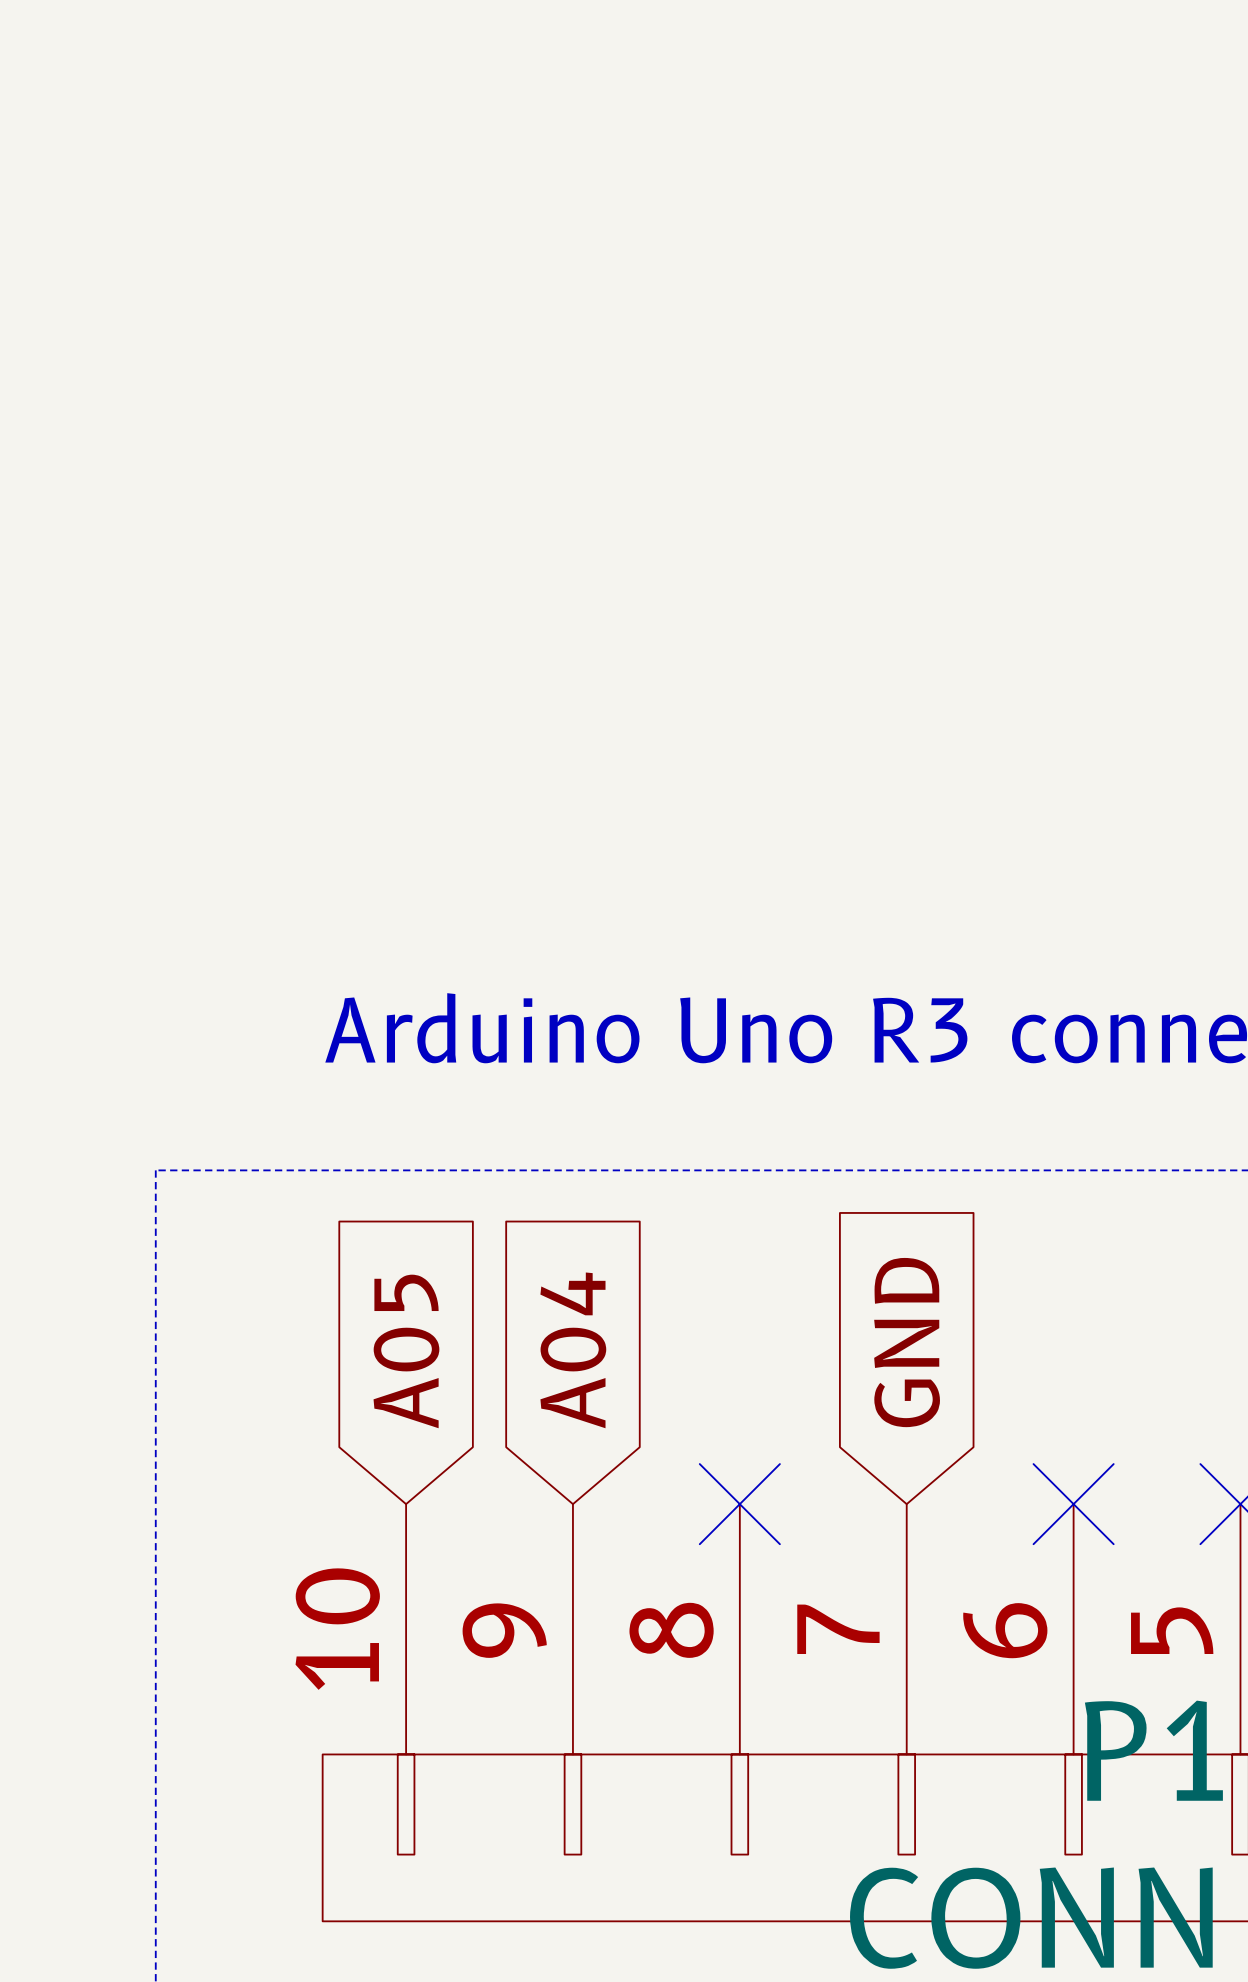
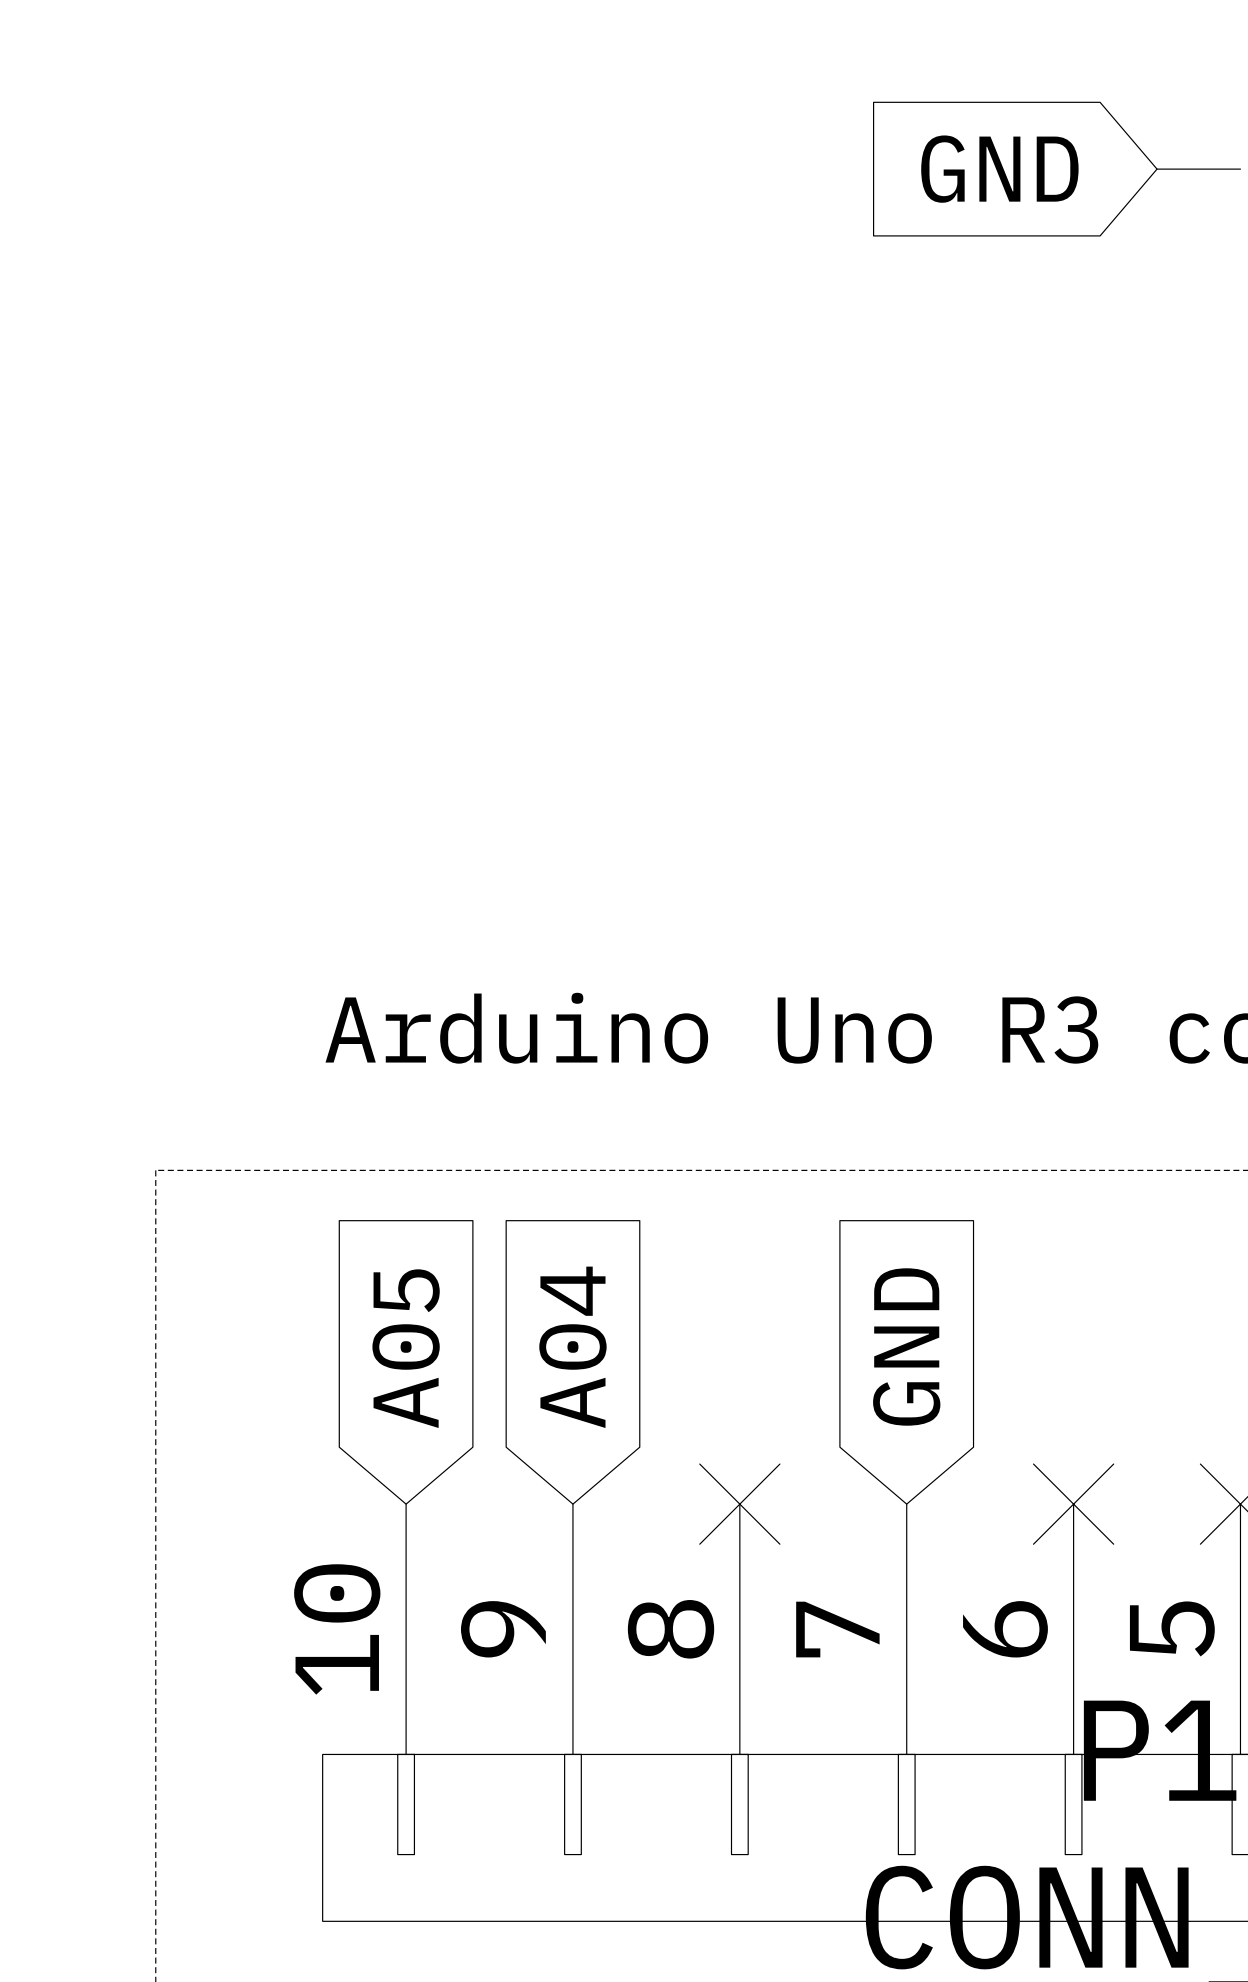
global label: none -> GND (999, 169)
wire: none -> (1157, 169) (1240, 169)

